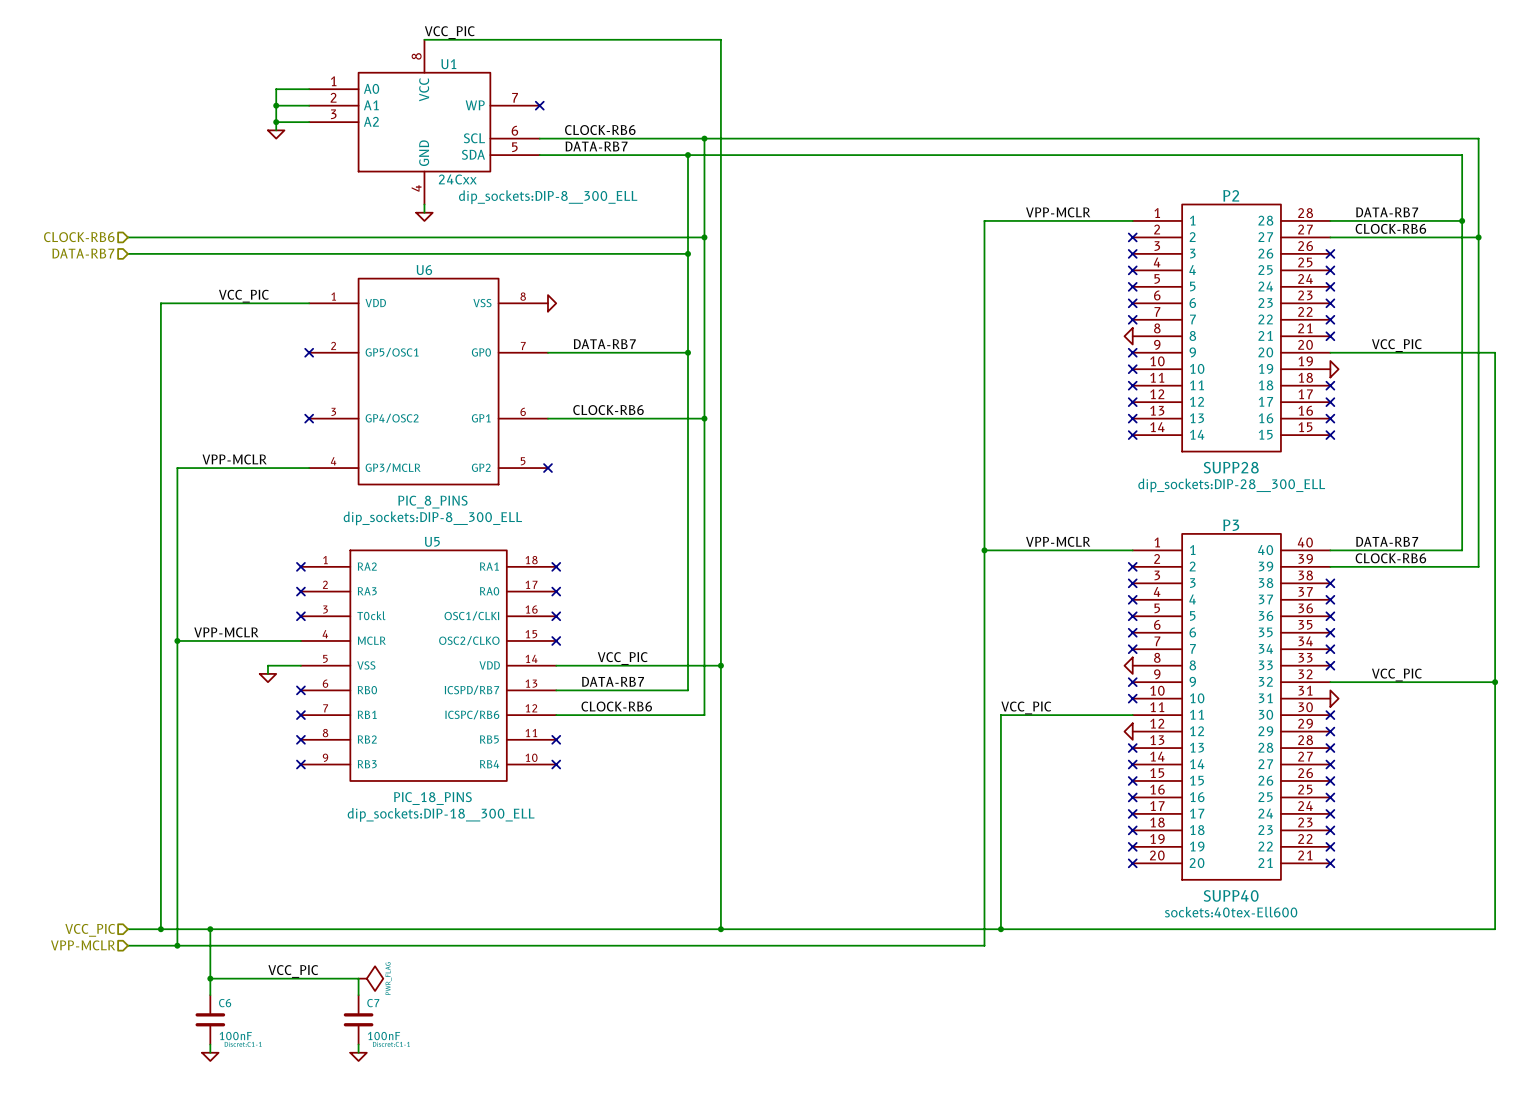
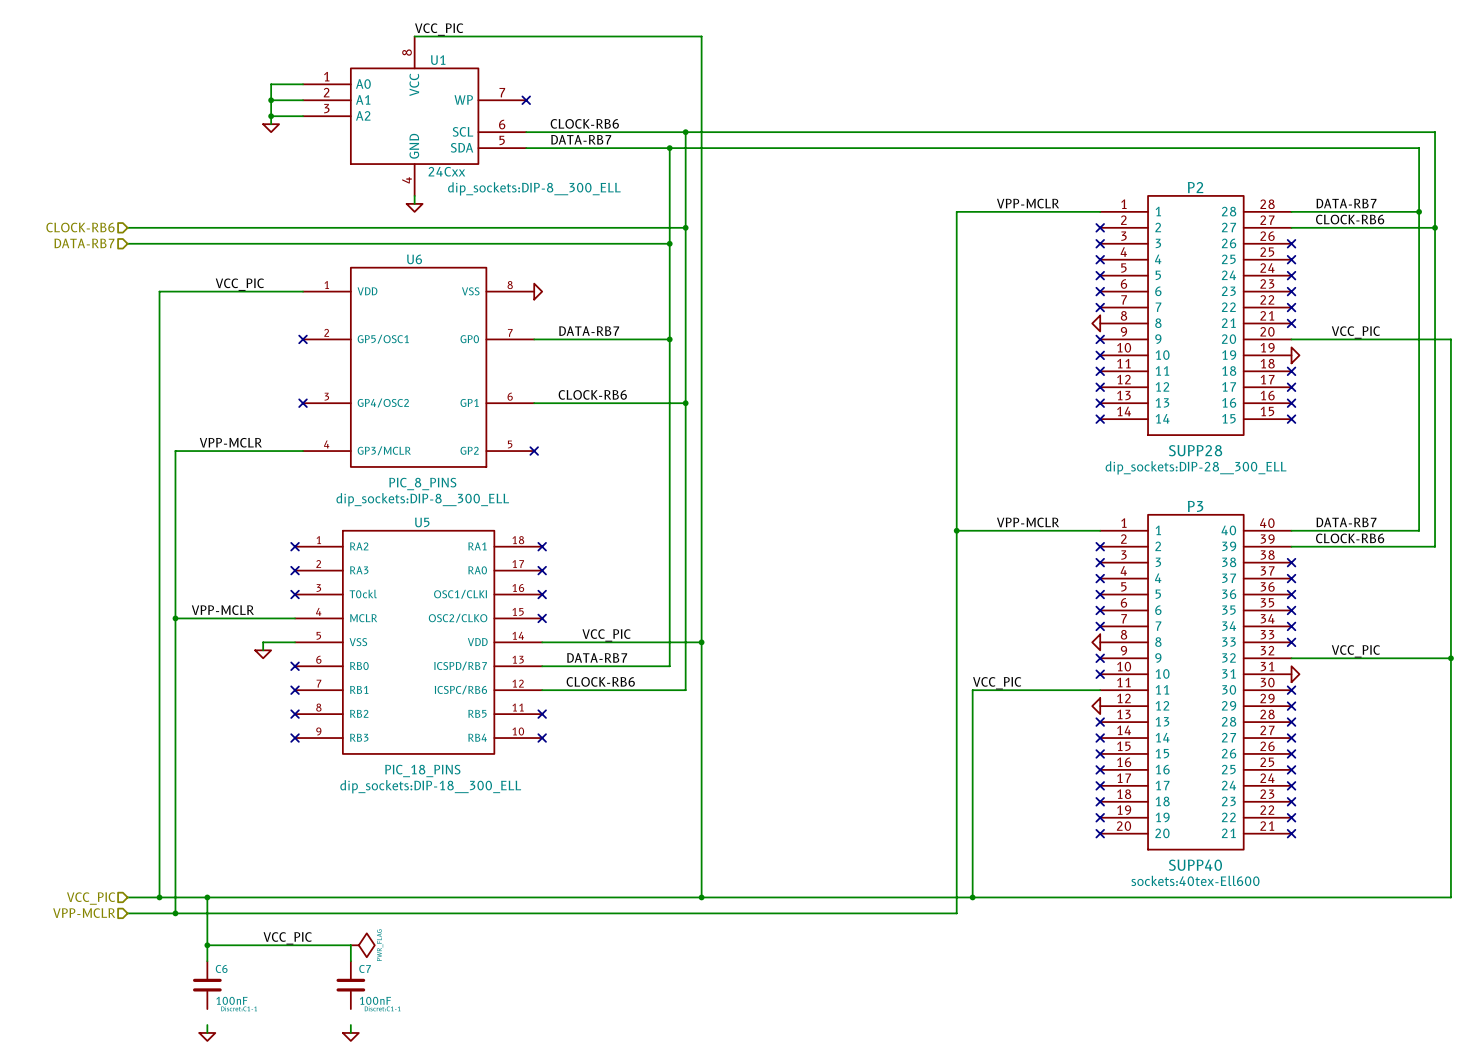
wire: (210, 1044) (210, 1052) -> (207, 1025) (207, 1032)
wire: (358, 1044) (358, 1052) -> (350, 1025) (350, 1032)
power symbol position: (210, 1056) -> (207, 1036)
power symbol position: (358, 1056) -> (350, 1036)

